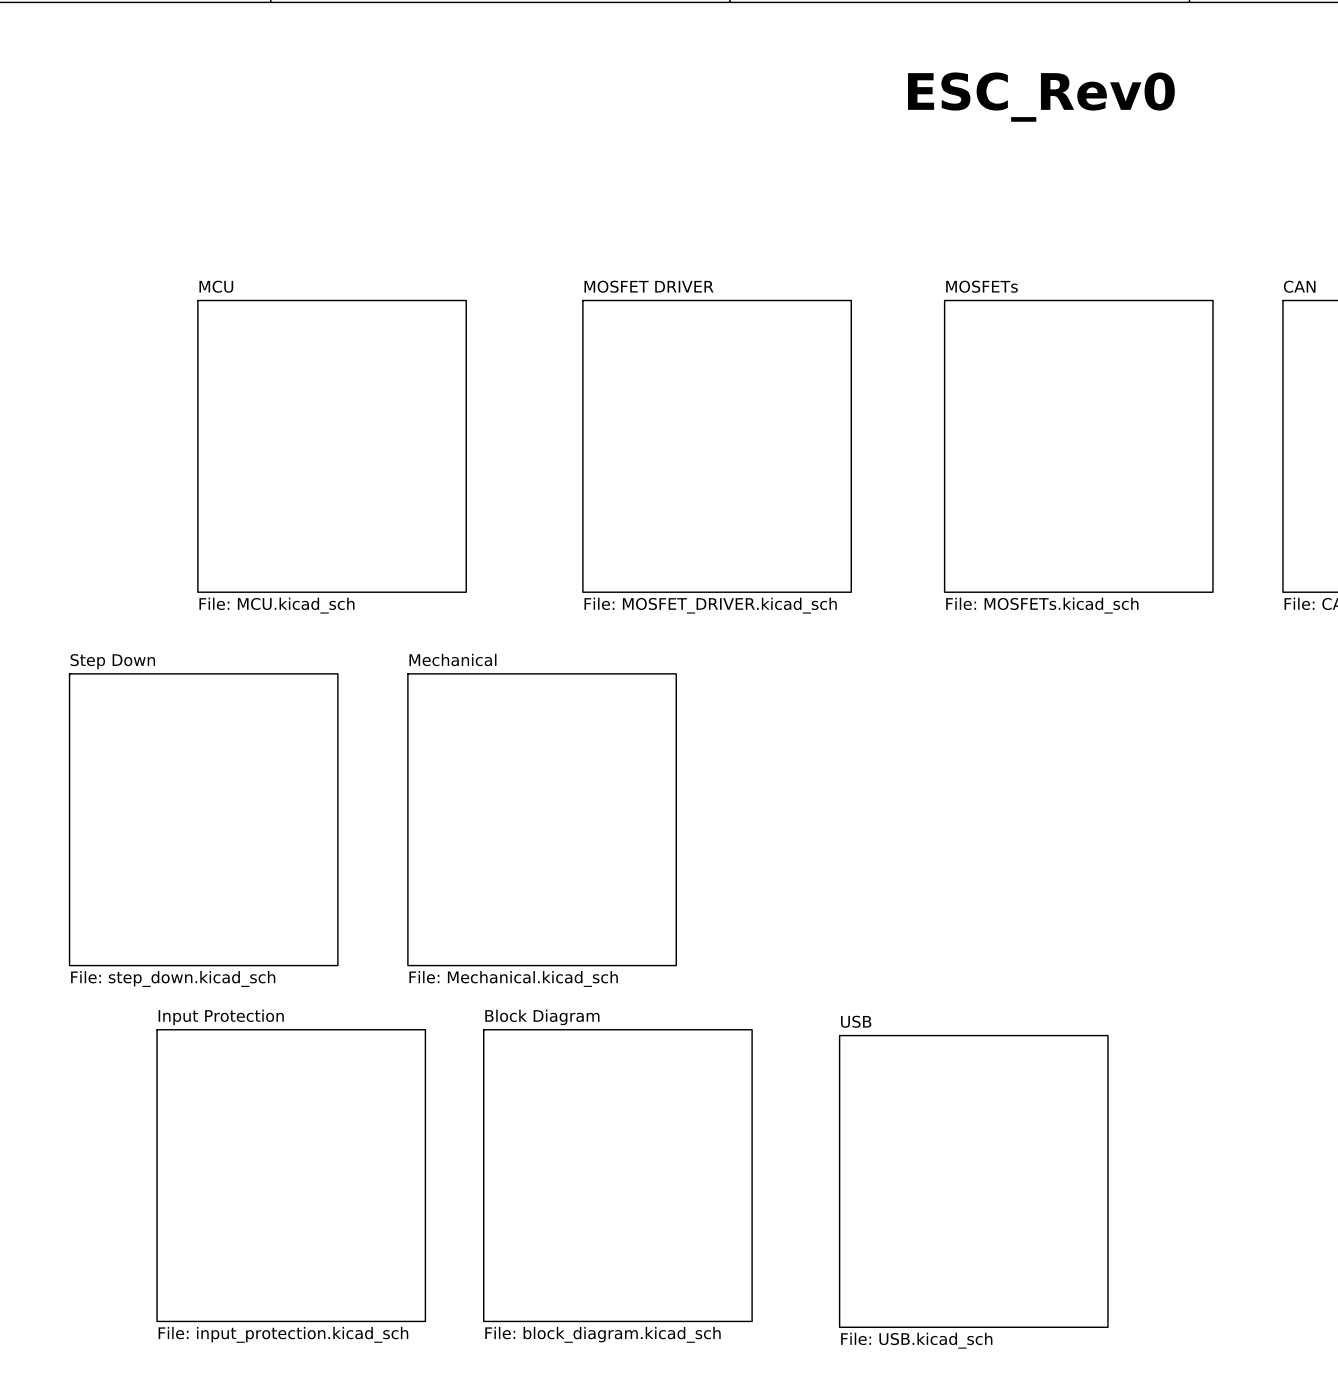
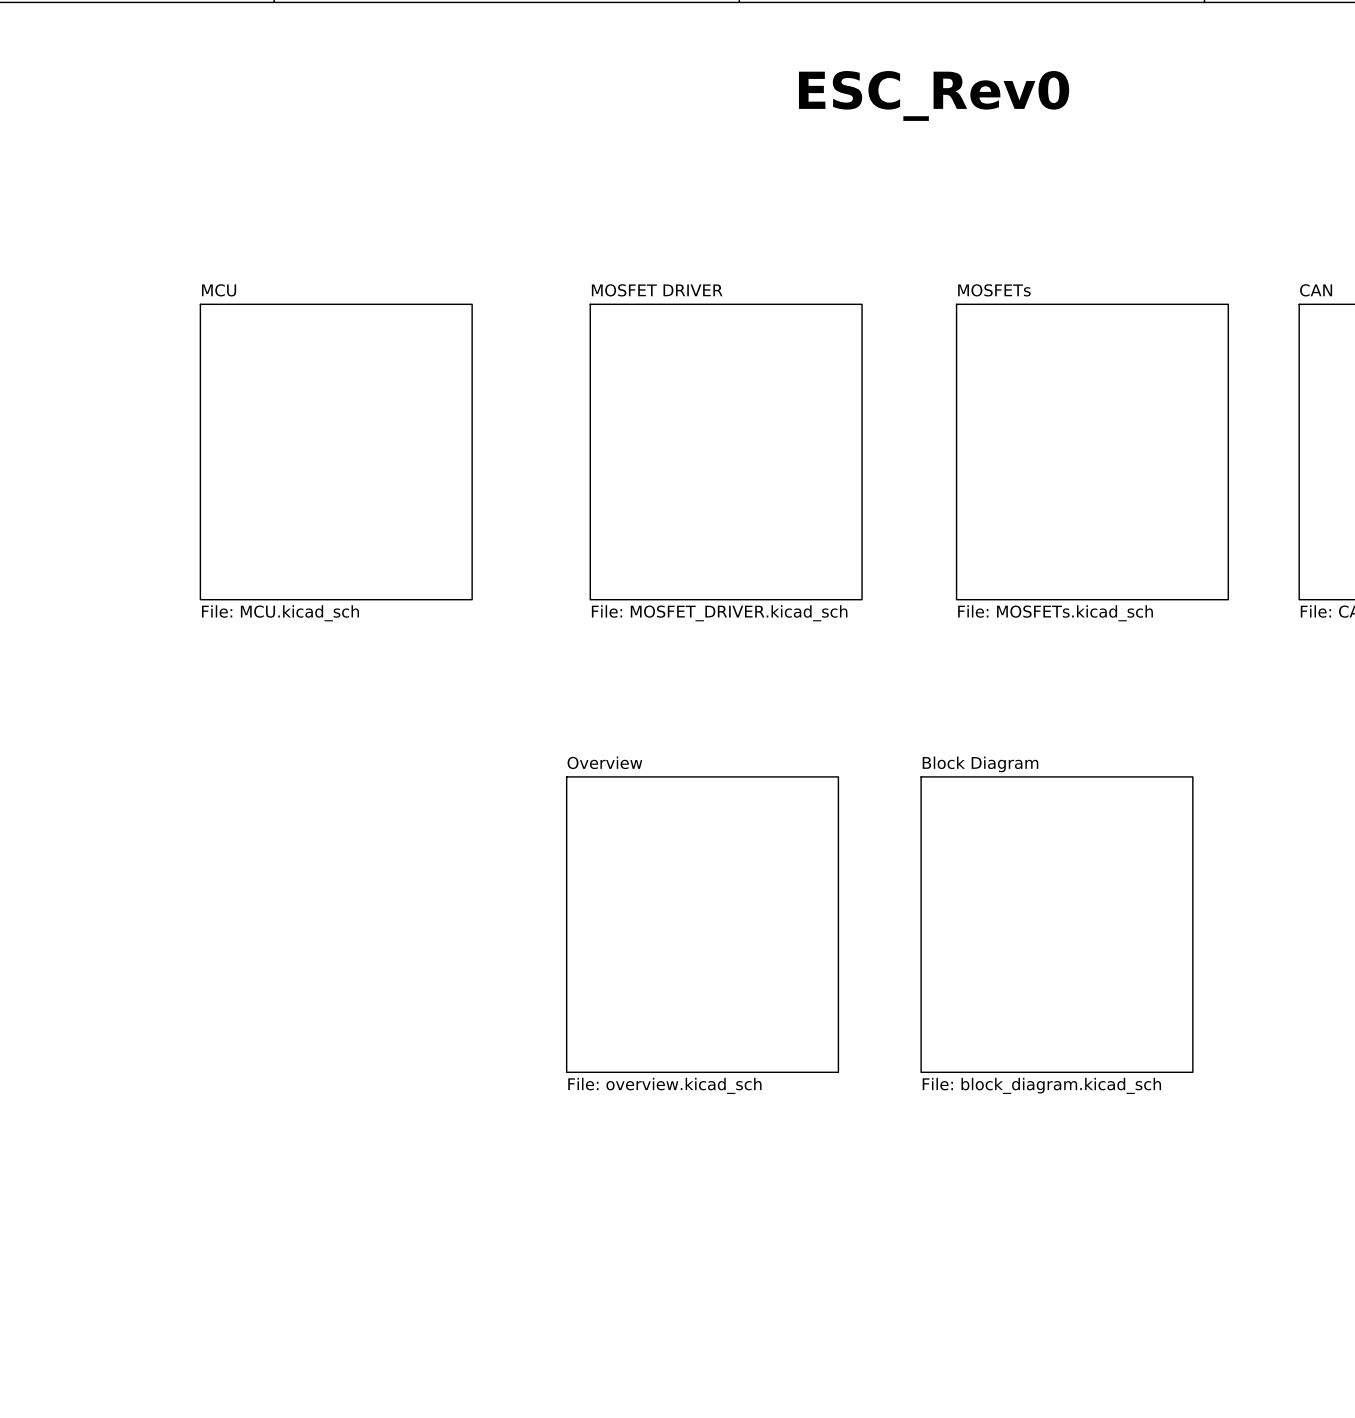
text position: ESC_Rev0 (1041, 97) -> ESC_Rev0 (934, 95)
sheet Step Down: File: step_down.kicad_sch (203, 819) -> none
sheet Mechanical: File: Mechanical.kicad_sch (542, 819) -> none
sheet Overview: none -> File: overview.kicad_sch (702, 924)
sheet Block Diagram: none -> File: block_diagram.kicad_sch (1056, 924)
sheet Input Protection: File: input_protection.kicad_sch (291, 1175) -> none
sheet Block Diagram: File: block_diagram.kicad_sch (617, 1175) -> none
sheet USB: File: USB.kicad_sch (973, 1181) -> none

